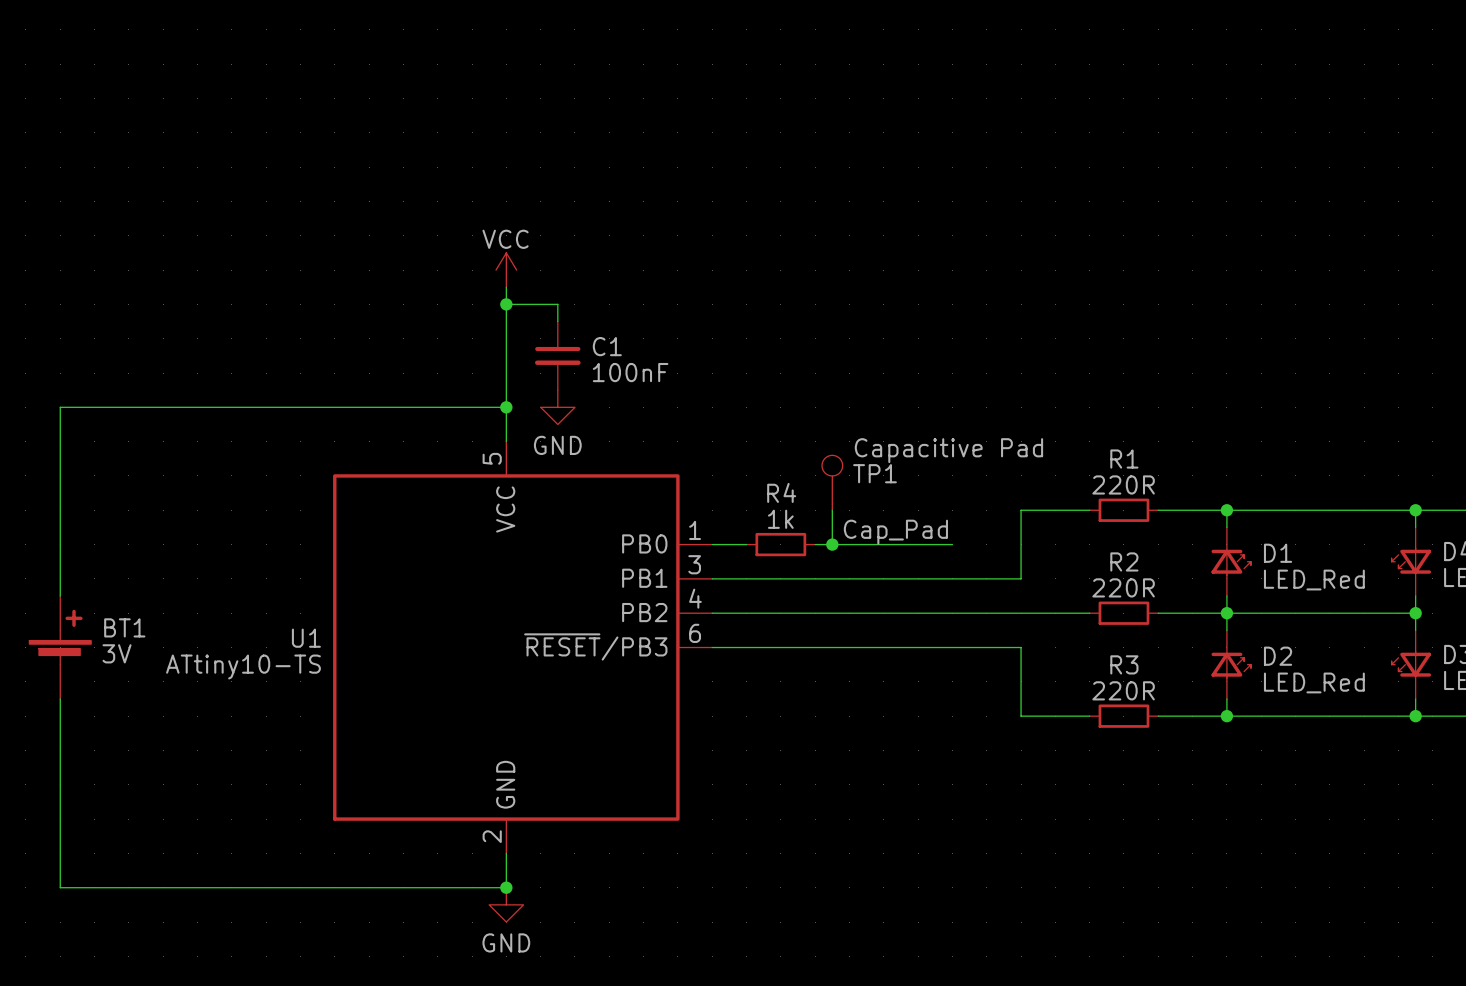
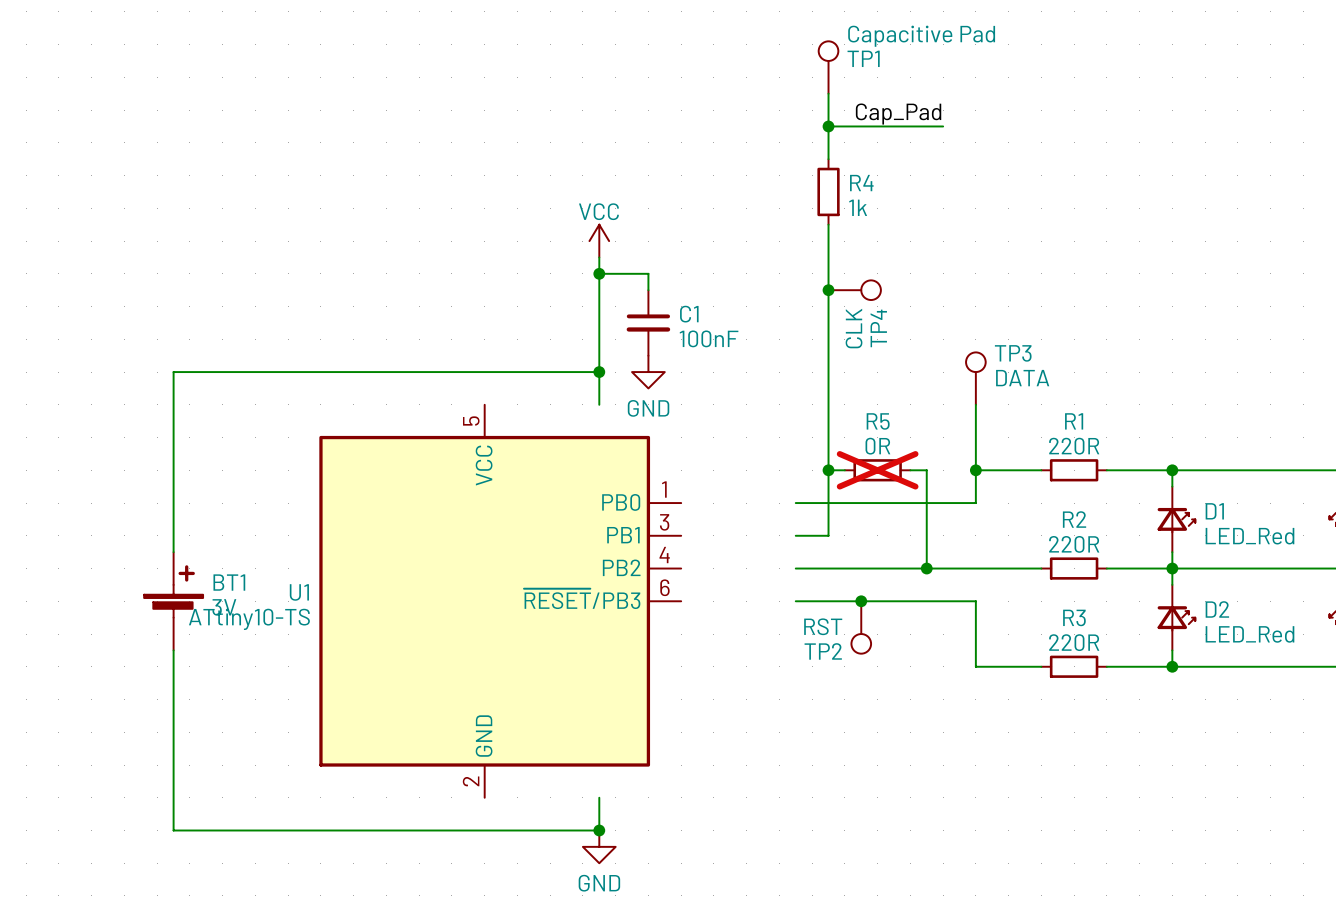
wire: none -> (828, 93) (828, 159)
label: none -> Cap_Pad (898, 114)
wire: none -> (828, 126) (943, 126)
junction: none -> (828, 126)
wire: none -> (828, 224) (828, 535)
power symbol position: VCC (506, 270) -> VCC (599, 241)
wire: (506, 287) (506, 441) -> (599, 257) (599, 404)
wire: (506, 304) (557, 304) (557, 321) -> (599, 273) (648, 273) (648, 290)
junction: (506, 304) -> none
junction: none -> (599, 273)
junction: none -> (828, 290)
TP4: none -> CLK (854, 290)
C1 position: (557, 355) -> (648, 322)
wire: (180, 407) (60, 407) (60, 596) -> (173, 372) (173, 552)
junction: (506, 407) -> none
power symbol position: GND (557, 407) -> GND (648, 372)
junction: none -> (599, 372)
TP3: none -> DATA (975, 378)
wire: none -> (975, 404) (975, 470)
TP1 position: (832, 482) -> (828, 67)
wire: (832, 510) (832, 544) (815, 544) -> none
wire: none -> (828, 470) (844, 470)
R5: none -> 0R (877, 470)
wire: none -> (910, 470) (926, 470) (926, 568)
junction: none -> (975, 470)
label: Cap_Pad (895, 532) -> none
wire: (712, 544) (746, 544) -> none
R4 rotation: 0° (780, 544) -> 90° clockwise (828, 191)
R4 position: (780, 544) -> (828, 191)
junction position: (832, 544) -> (828, 470)
wire: (1021, 544) (1021, 578) (866, 578) -> (975, 503) (910, 503)
wire: (712, 578) (832, 578) -> (484, 372) (599, 372)
wire: (712, 613) (832, 613) -> none
junction: none -> (926, 568)
BT1 position: (60, 647) -> (173, 601)
wire: (712, 647) (832, 647) -> none
junction: none -> (861, 601)
TP2: none -> RST (861, 627)
wire: (60, 698) (60, 887) (180, 887) -> (173, 650) (173, 830)
wire: (506, 853) (506, 887) -> (599, 797) (599, 830) (484, 830)
junction: (506, 887) -> none
junction: none -> (599, 830)
power symbol position: GND (506, 904) -> GND (599, 846)

